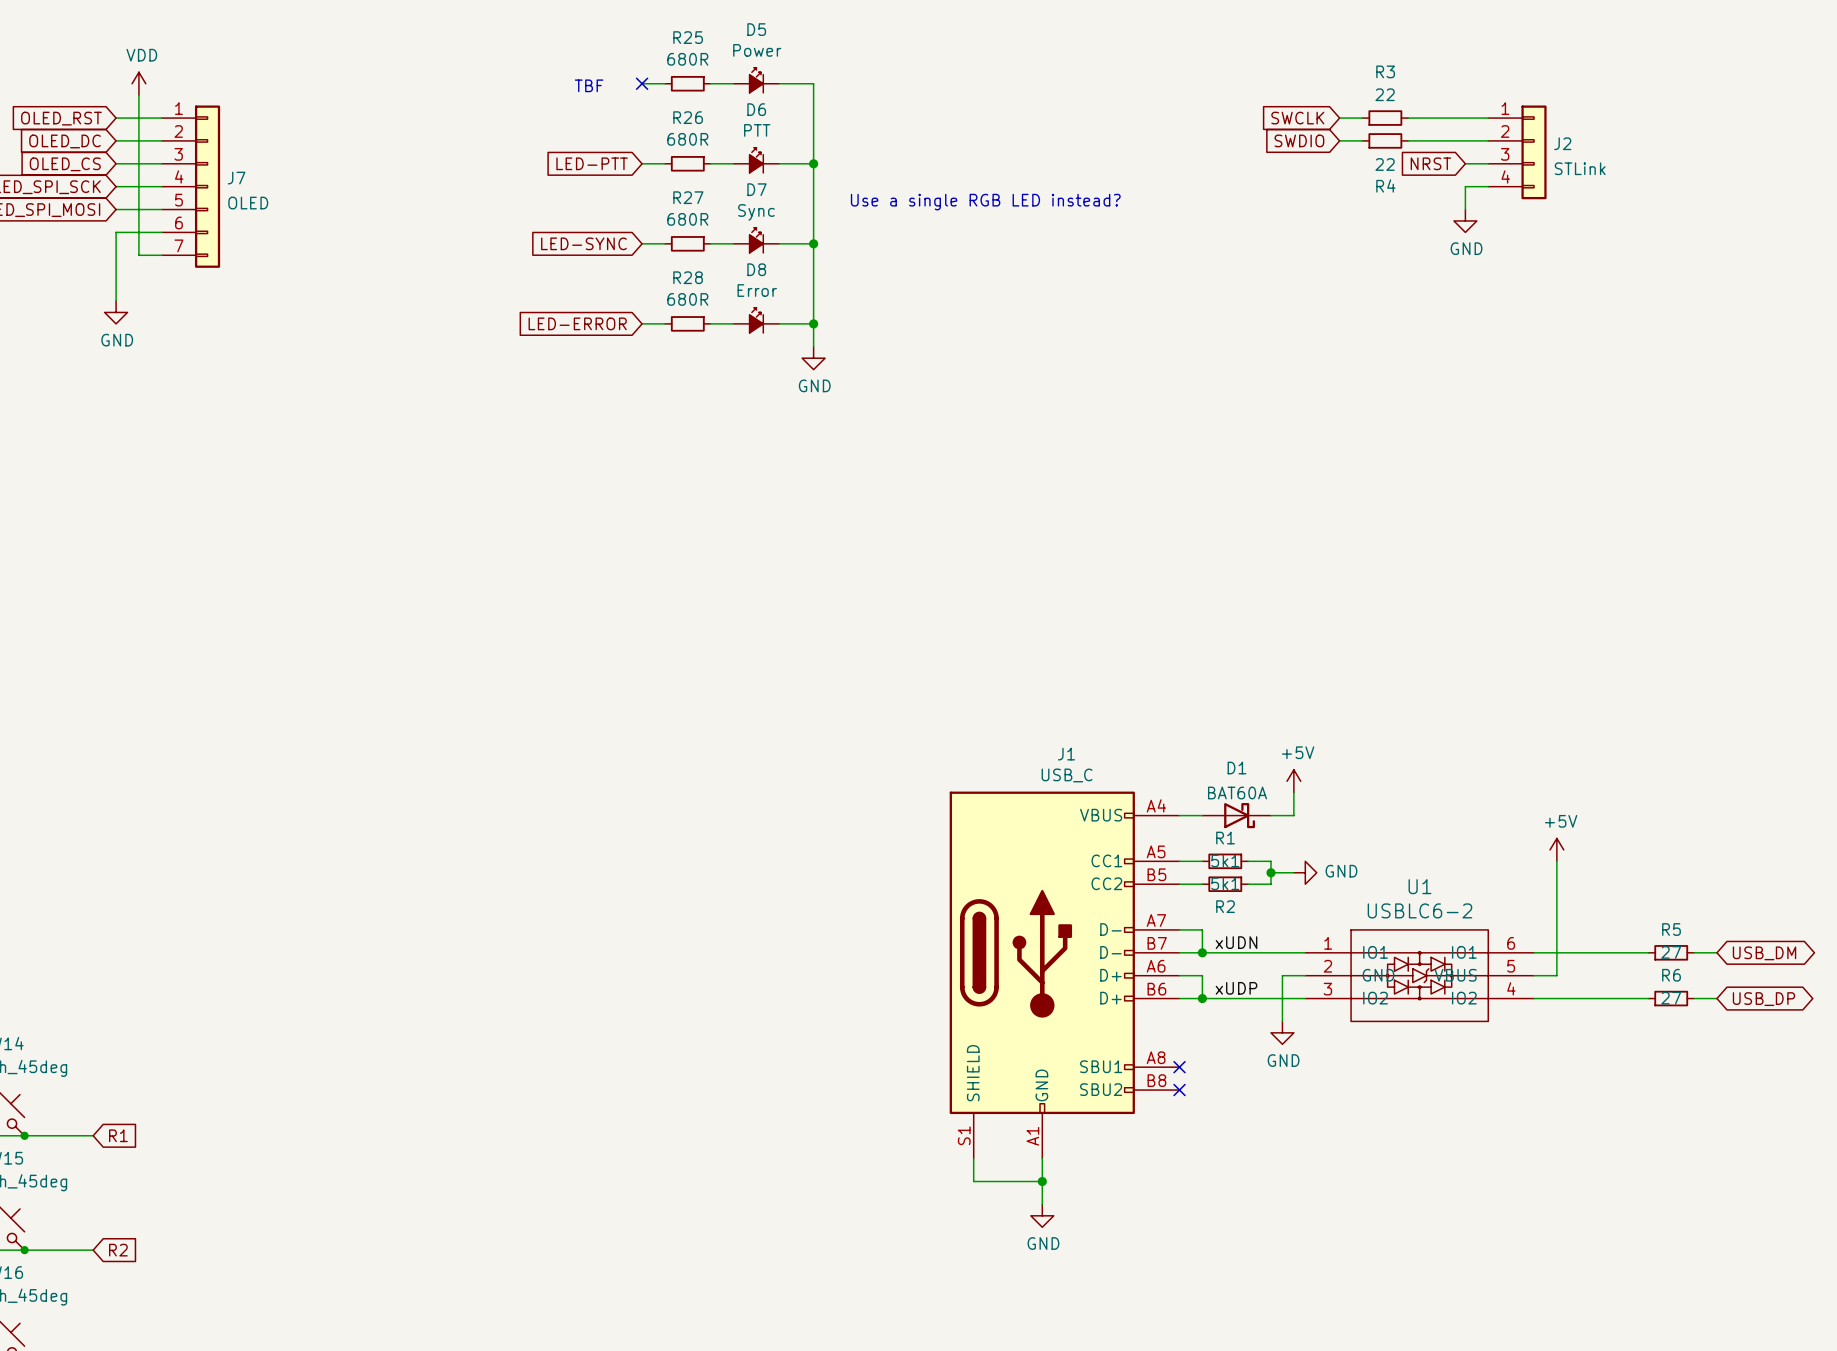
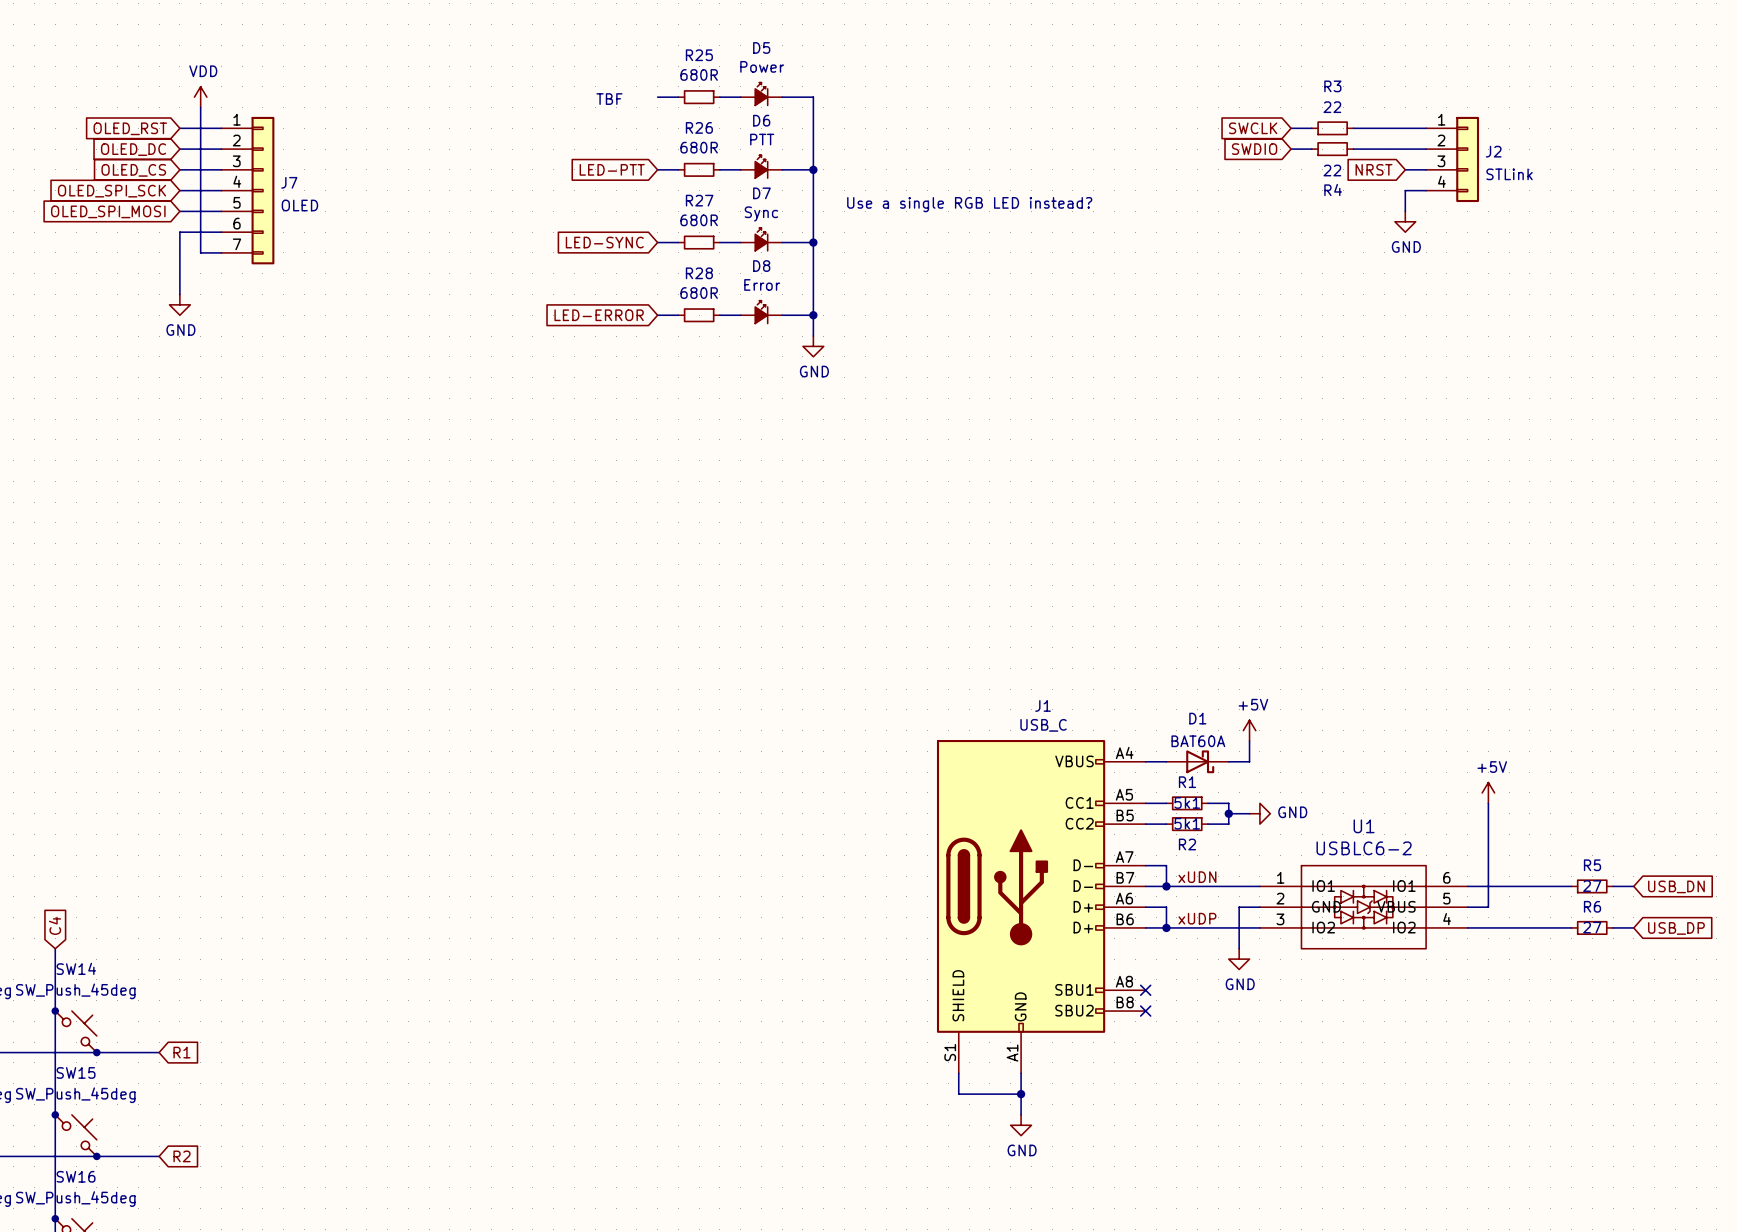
no-connect mark: (642, 83) -> none
global label shape: bidirectional (1764, 953) -> input (1676, 886)
global label: USB_DM (1764, 953) -> USB_DN (1676, 886)
global label shape: bidirectional (1763, 999) -> input (1676, 928)

